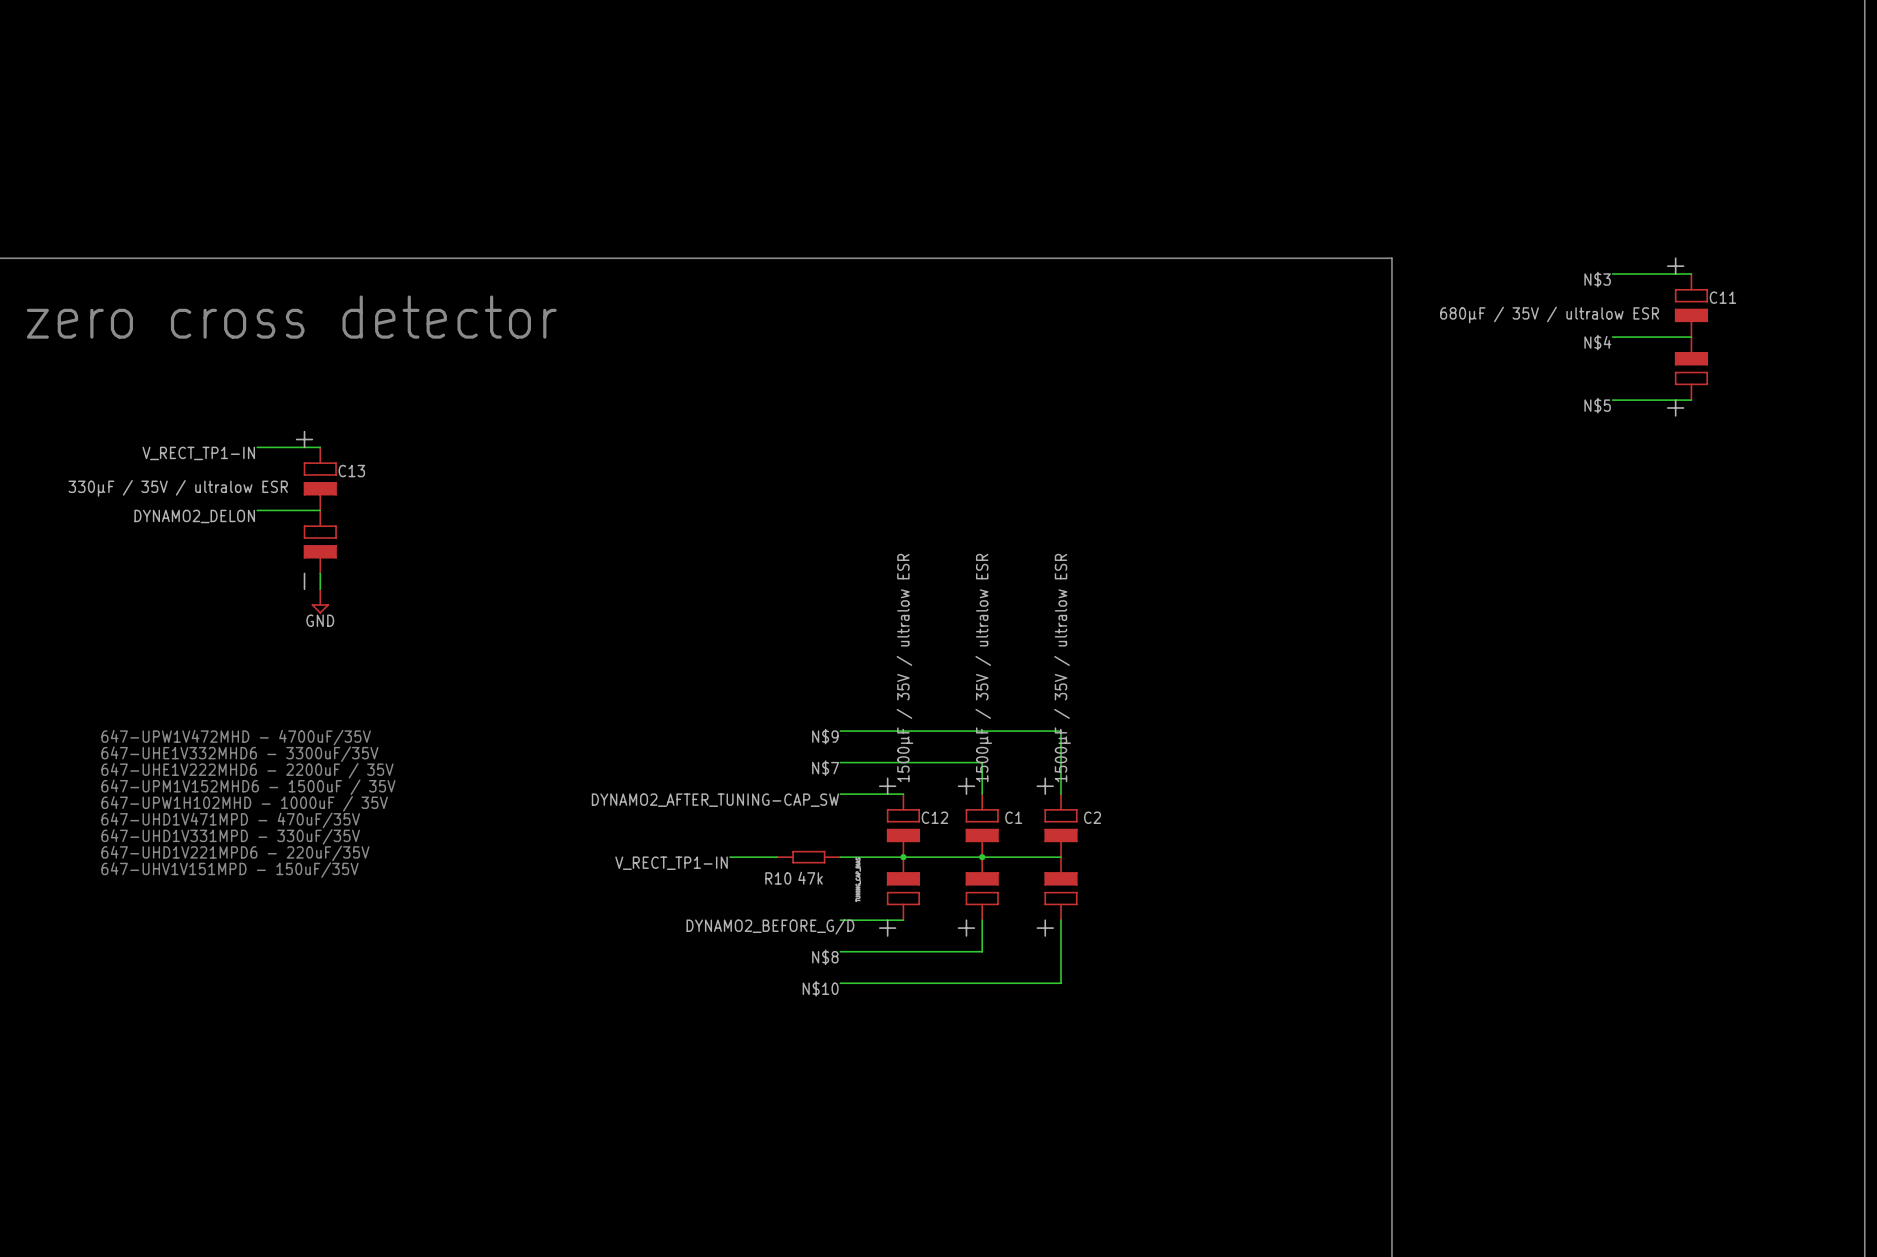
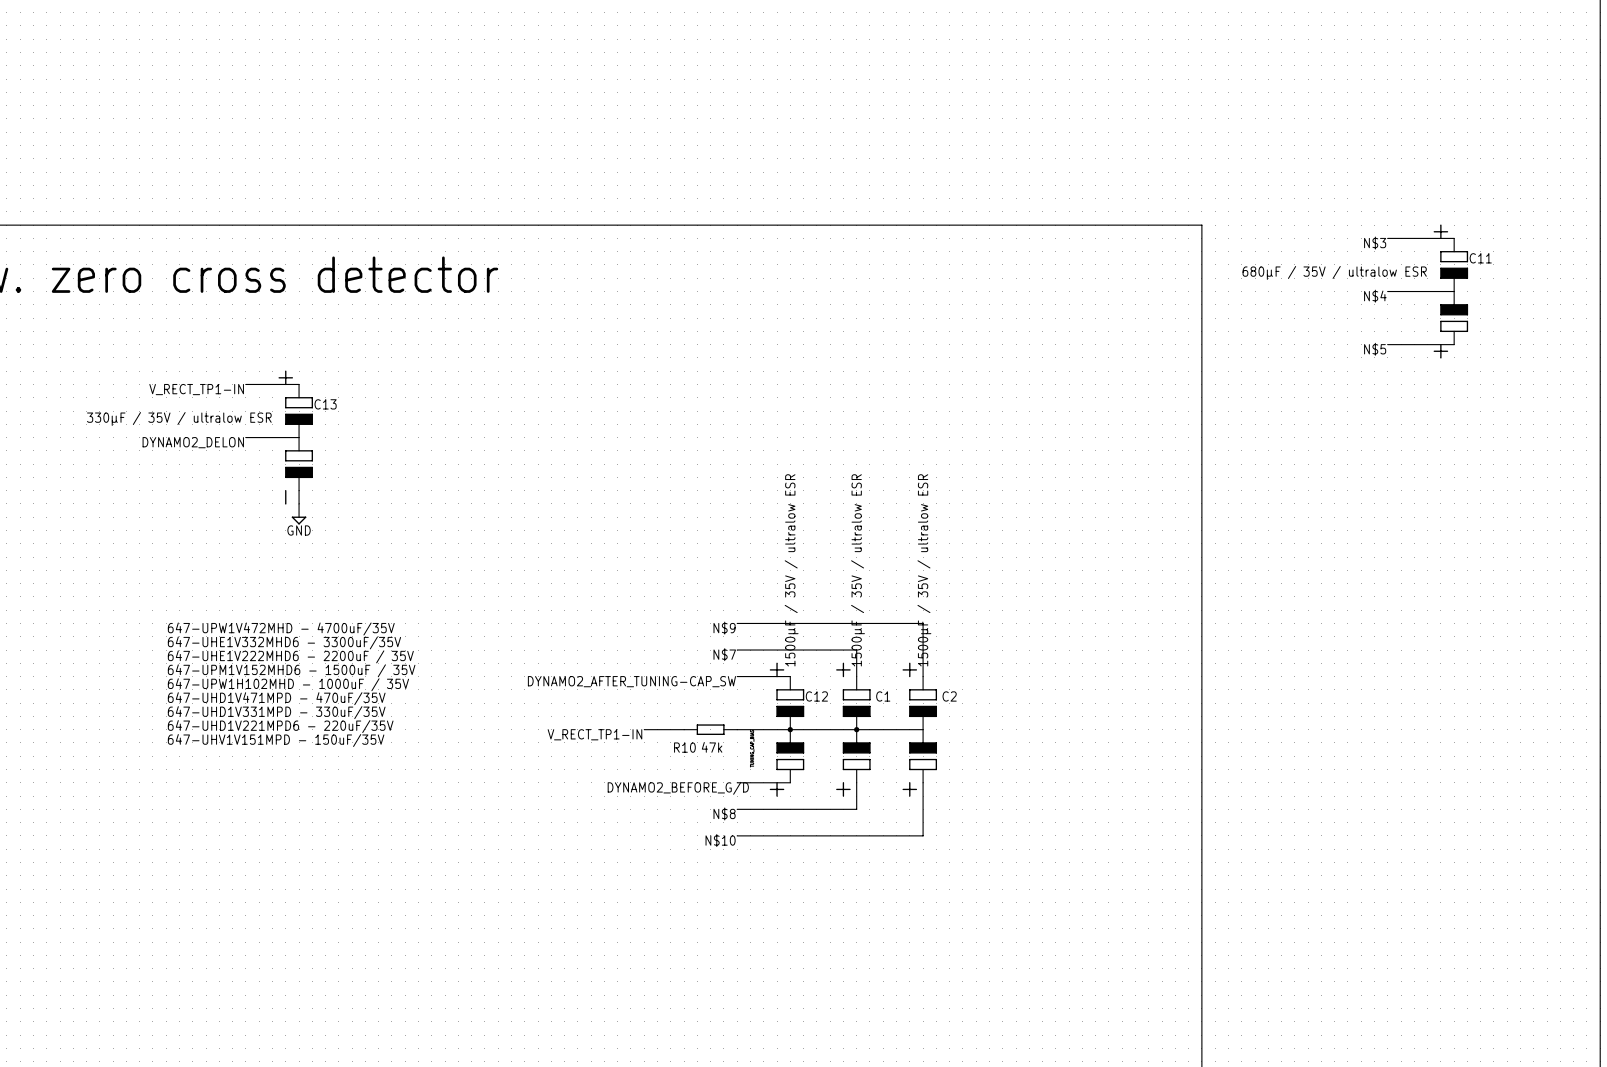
text position: 647-UPW1V472MHD - 4700uF/35V (236, 737) -> 647-UPW1V472MHD - 4700uF/35V (281, 628)
text position: 647-UHE1V332MHD6 - 3300uF/35V (239, 754) -> 647-UHE1V332MHD6 - 3300uF/35V (284, 642)
text position: 647-UHE1V222MHD6 - 2200uF / 35V (247, 770) -> 647-UHE1V222MHD6 - 2200uF / 35V (290, 656)
text position: 647-UPM1V152MHD6 - 1500uF / 35V (248, 787) -> 647-UPM1V152MHD6 - 1500uF / 35V (291, 670)
text position: 647-UPW1H102MHD - 1000uF / 35V (244, 803) -> 647-UPW1H102MHD - 1000uF / 35V (288, 684)
text position: 647-UHD1V471MPD - 470uF/35V (230, 820) -> 647-UHD1V471MPD - 470uF/35V (276, 698)
text position: 647-UHD1V331MPD - 330uF/35V (230, 836) -> 647-UHD1V331MPD - 330uF/35V (276, 712)
text position: 647-UHD1V221MPD6 - 220uF/35V (235, 853) -> 647-UHD1V221MPD6 - 220uF/35V (280, 726)
text position: 647-UHV1V151MPD - 150uF/35V (230, 870) -> 647-UHV1V151MPD - 150uF/35V (276, 740)

